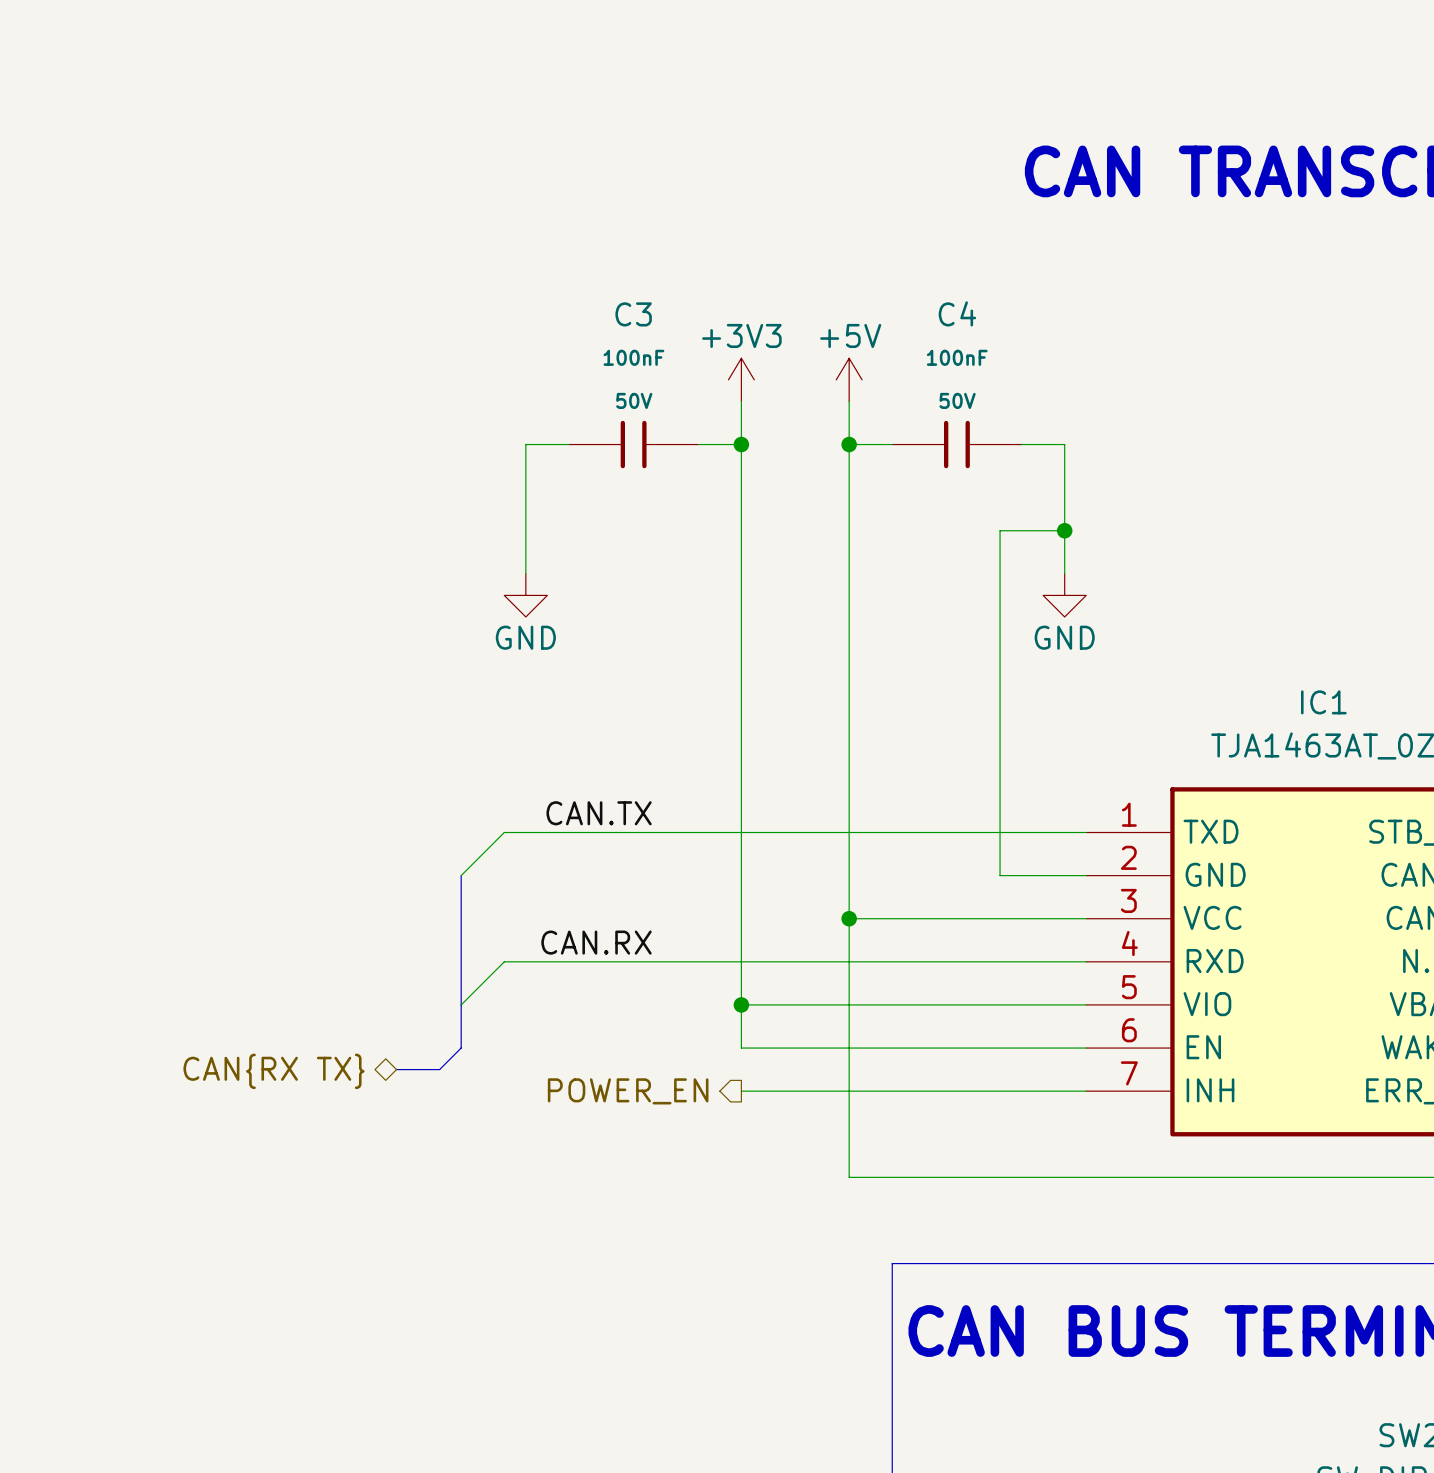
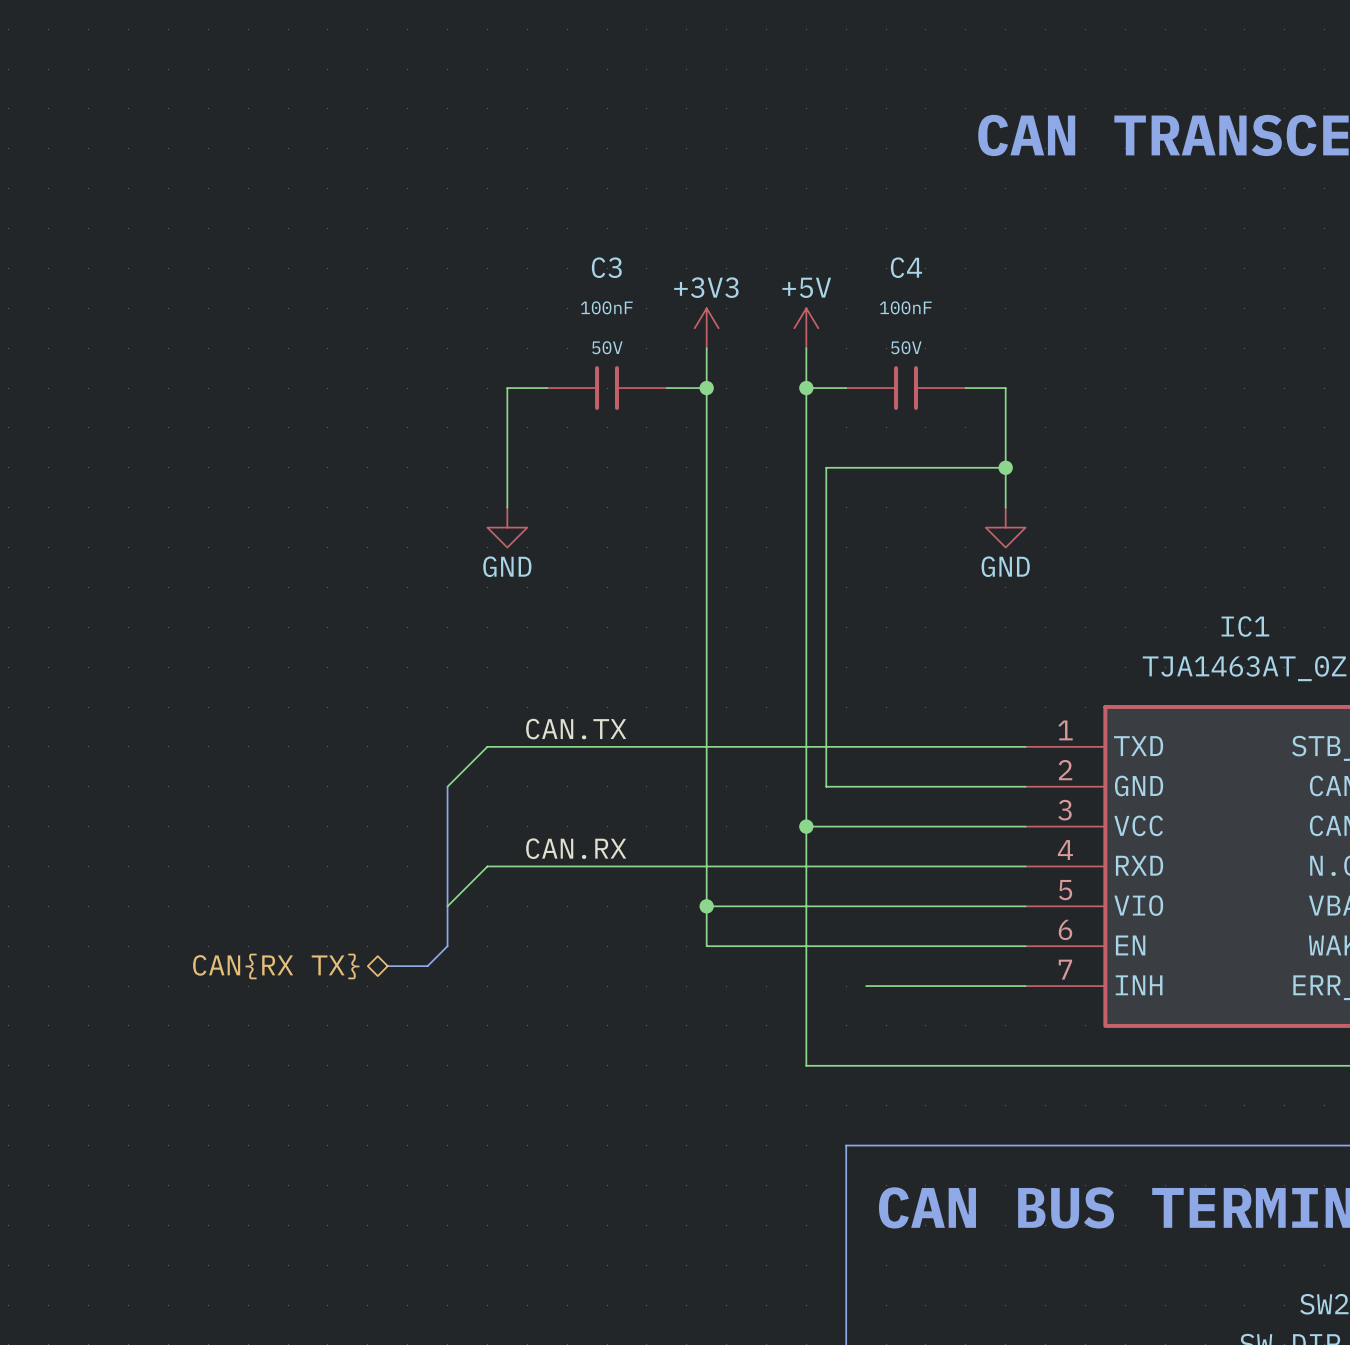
wire: (1000, 530) (1000, 875) -> (945, 467) (826, 467) (826, 786) (945, 786)
hierarchical label: POWER_EN (628, 1091) -> none
wire: (741, 1091) (913, 1091) -> none

